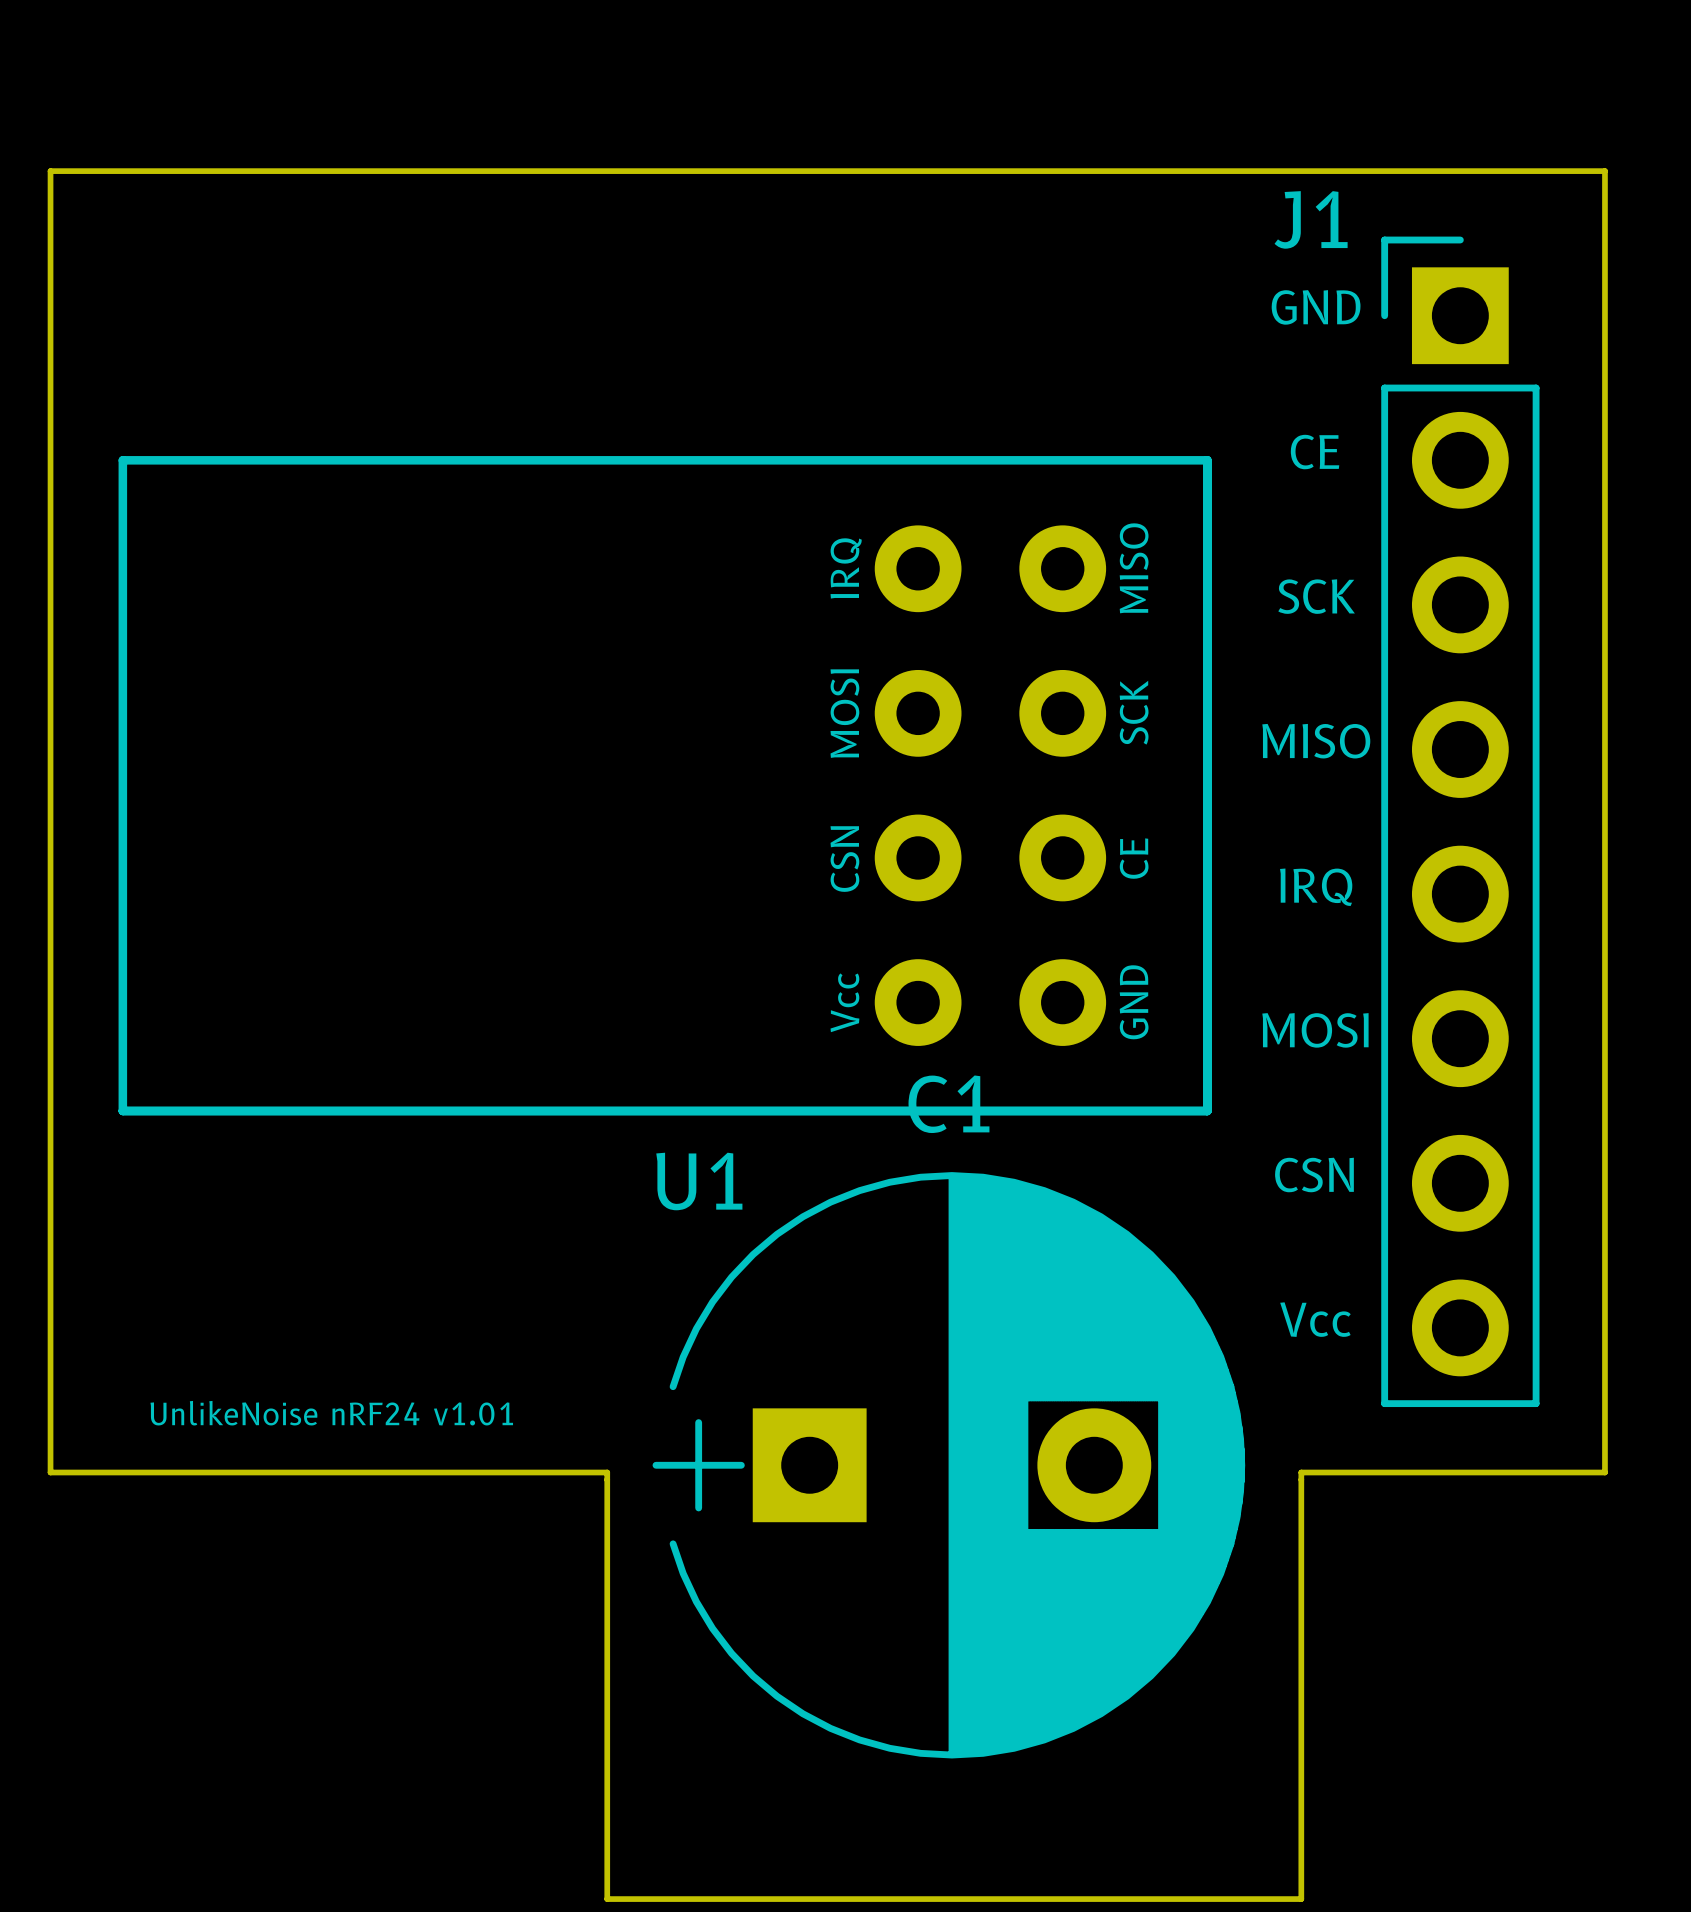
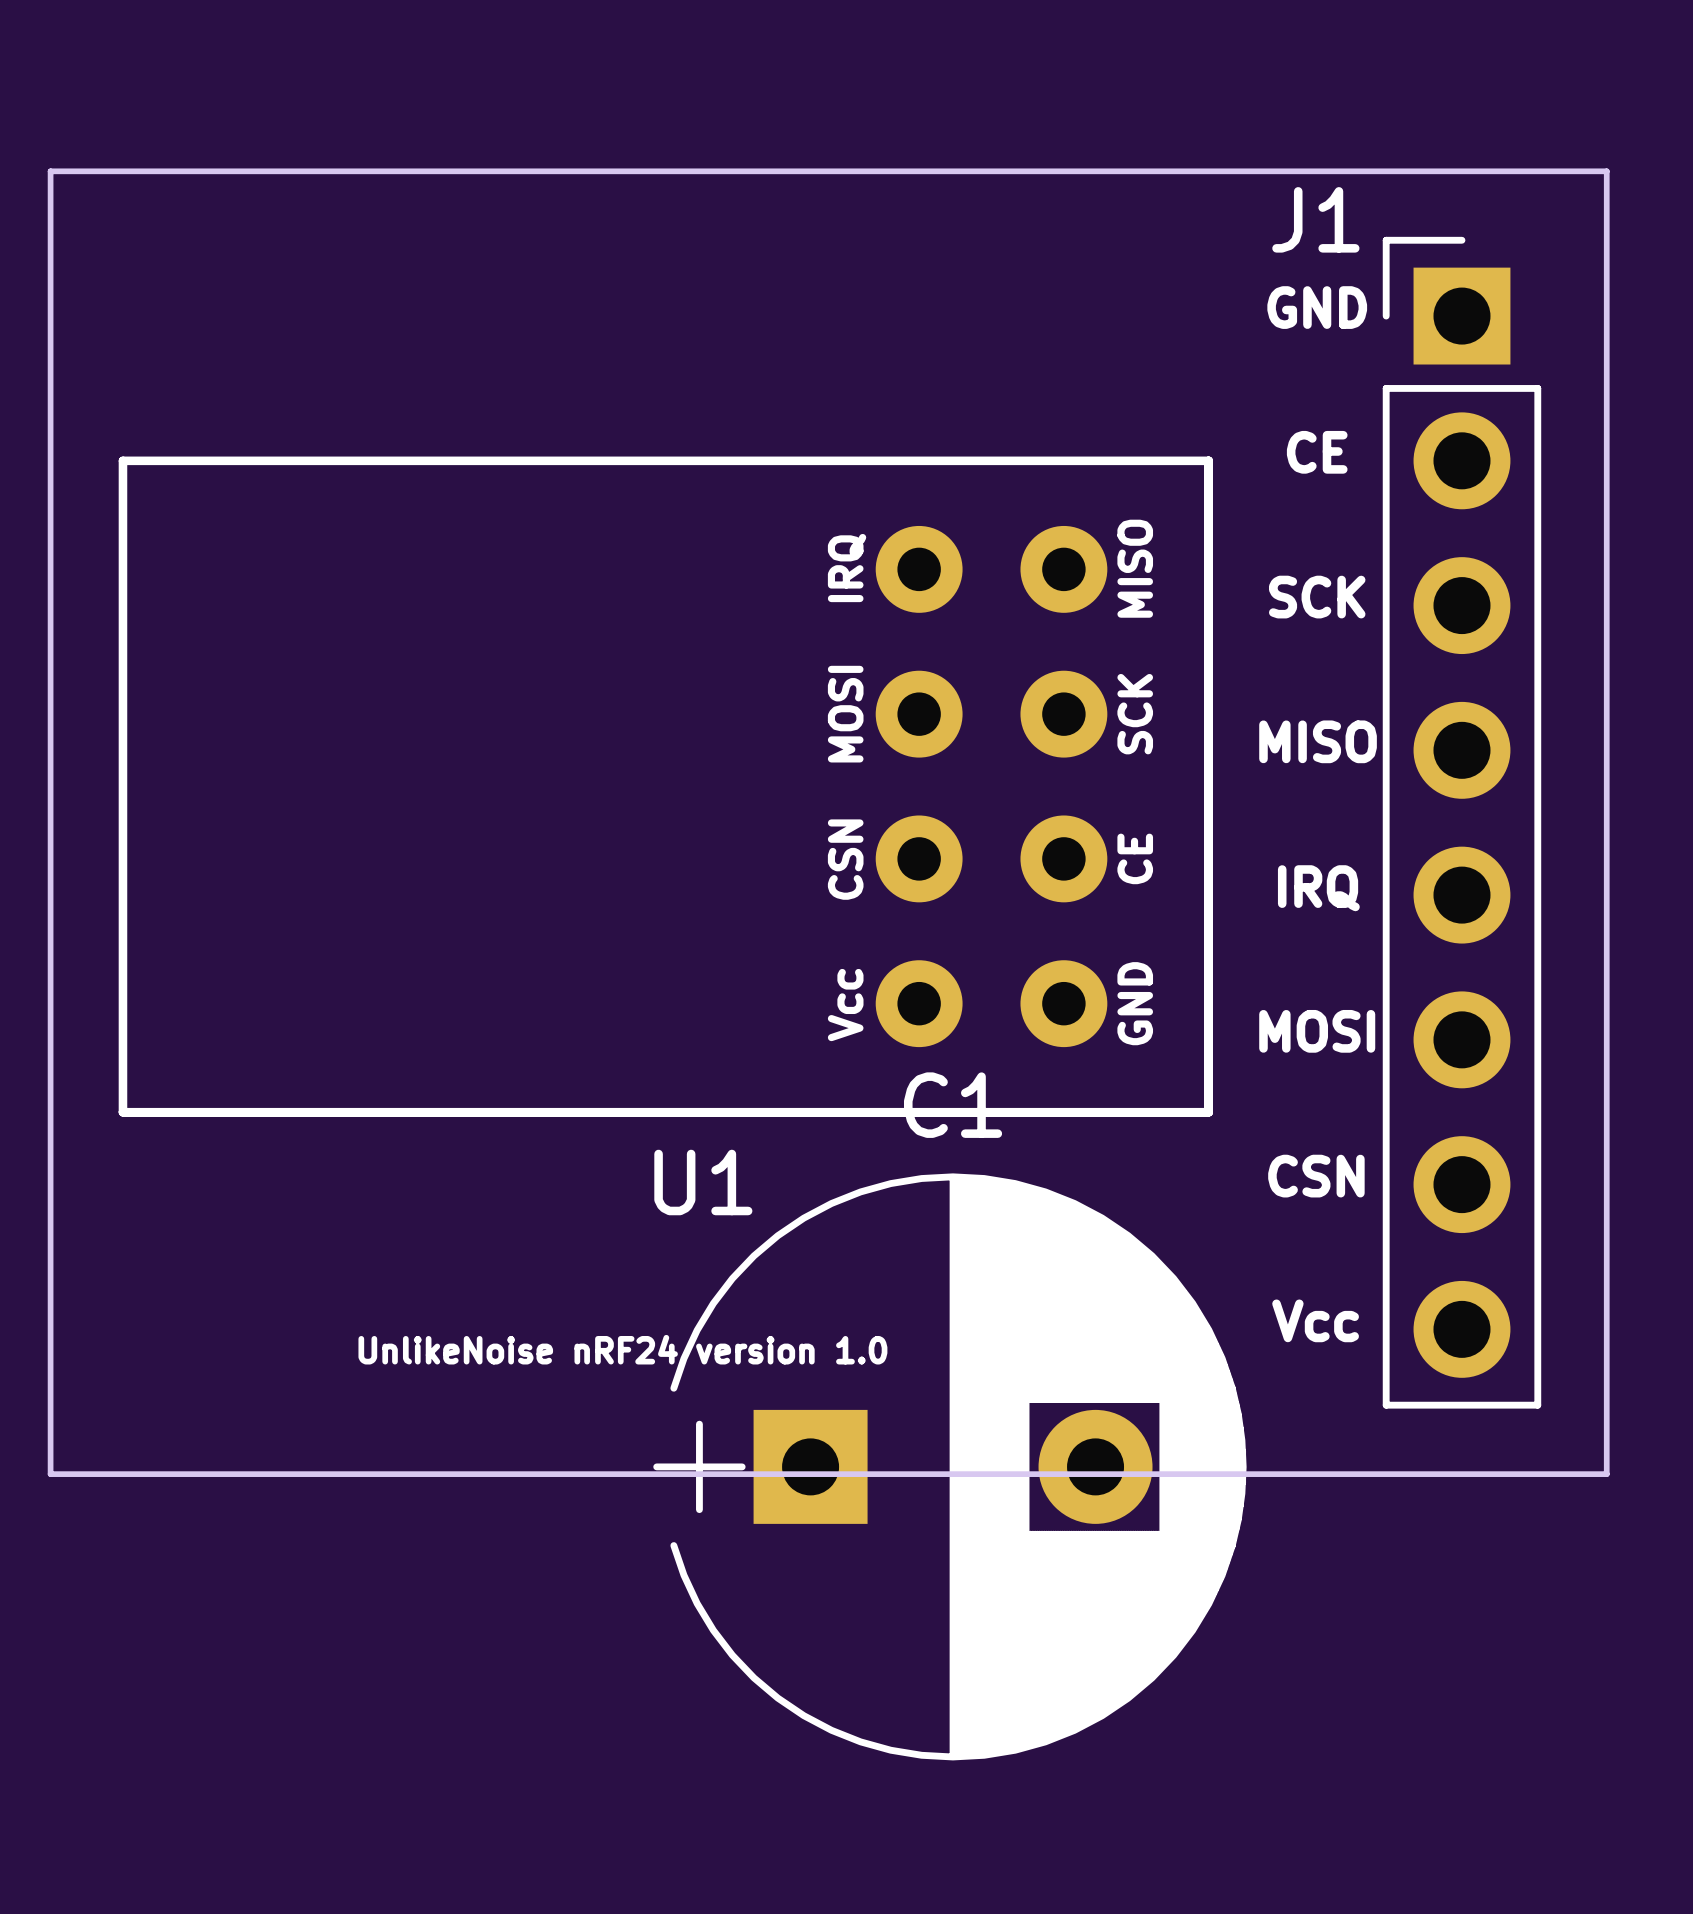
text: none -> UnlikeNoise nRF24 version 1.0 (622, 1349)
text: UnlikeNoise nRF24 v1.01 (331, 1413) -> none
board edge: (607, 1472) (607, 1899) (1301, 1899) (1301, 1472) -> (607, 1474) (1302, 1474)

